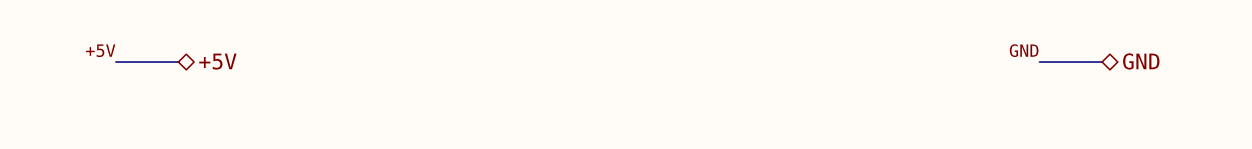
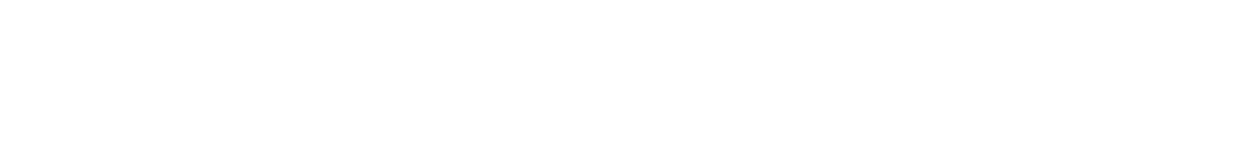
label: +5V (100, 50) -> none
label: GND (1024, 50) -> none
hierarchical label: +5V (217, 61) -> none
hierarchical label: GND (1141, 61) -> none
wire: (115, 62) (178, 62) -> none
wire: (1039, 62) (1102, 62) -> none

